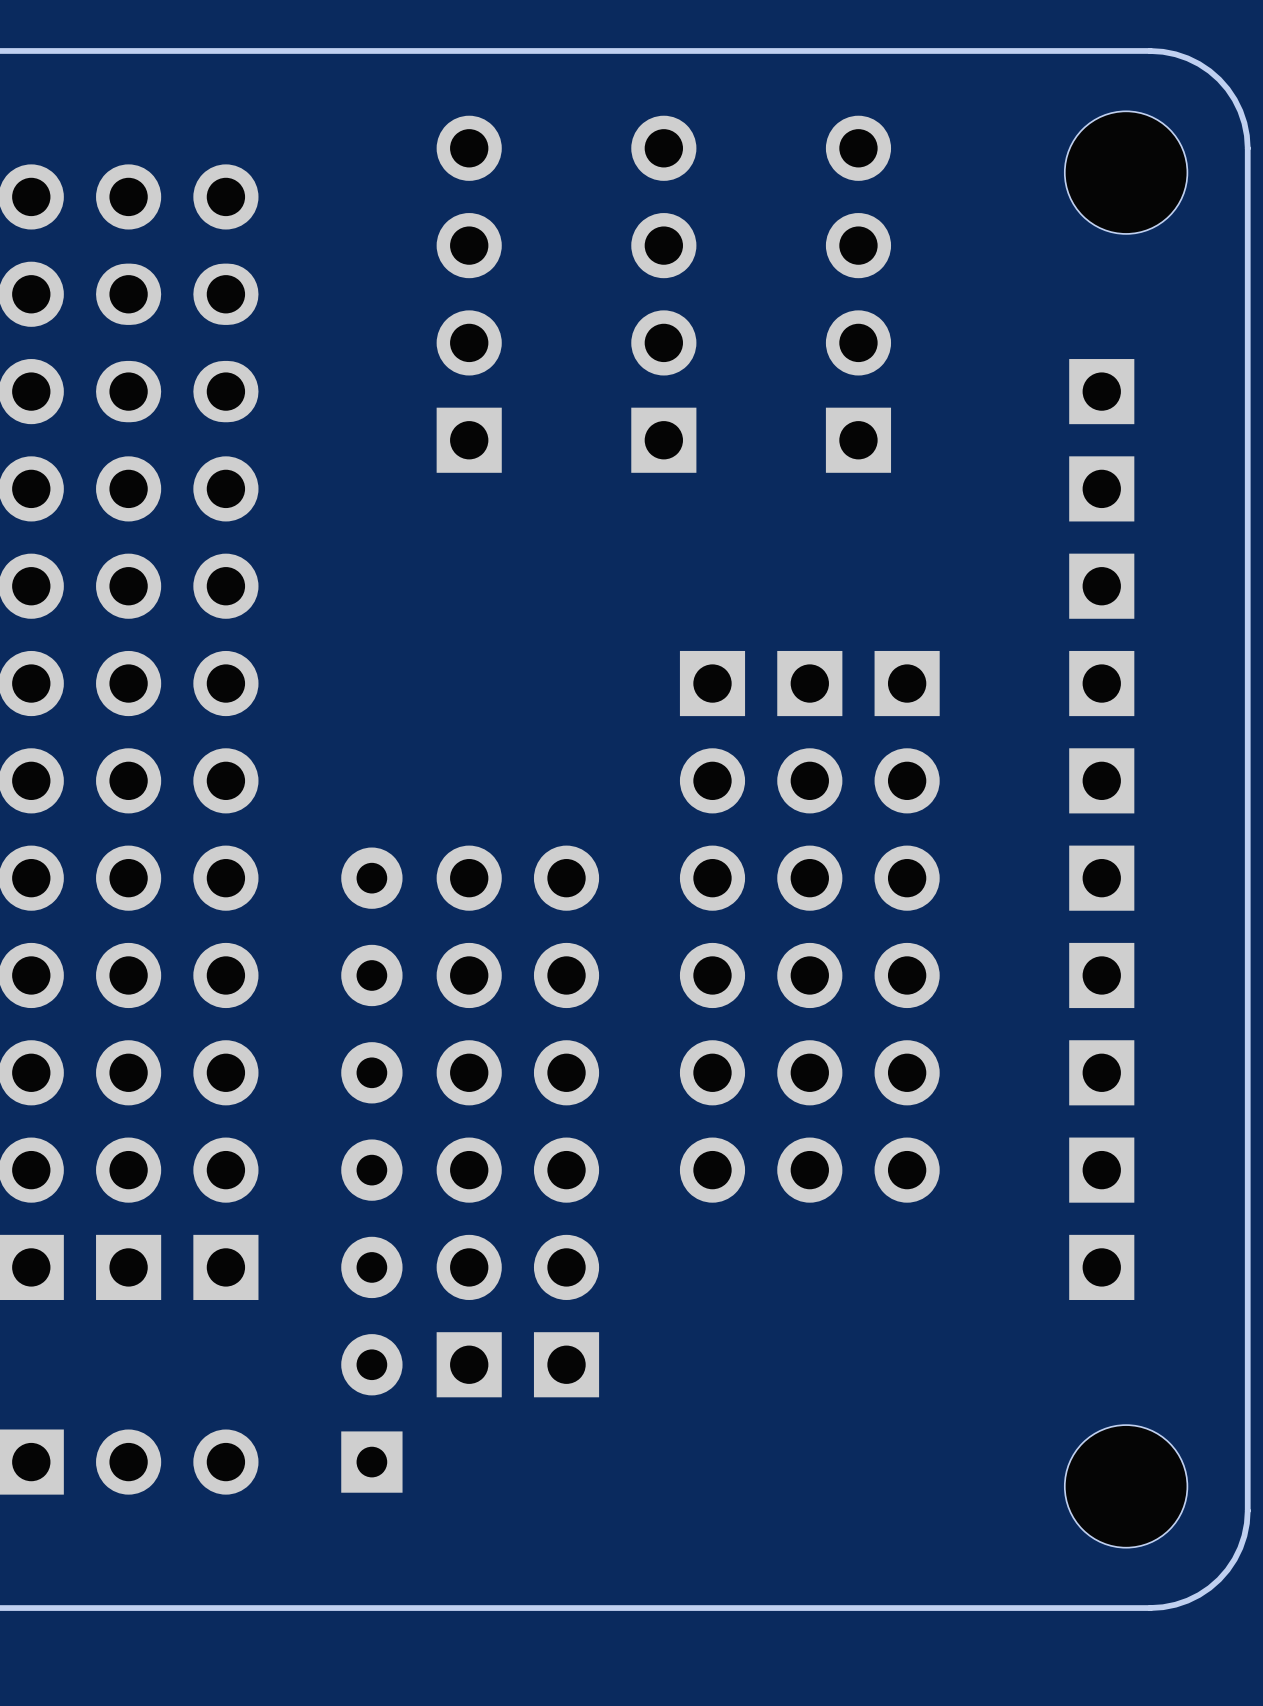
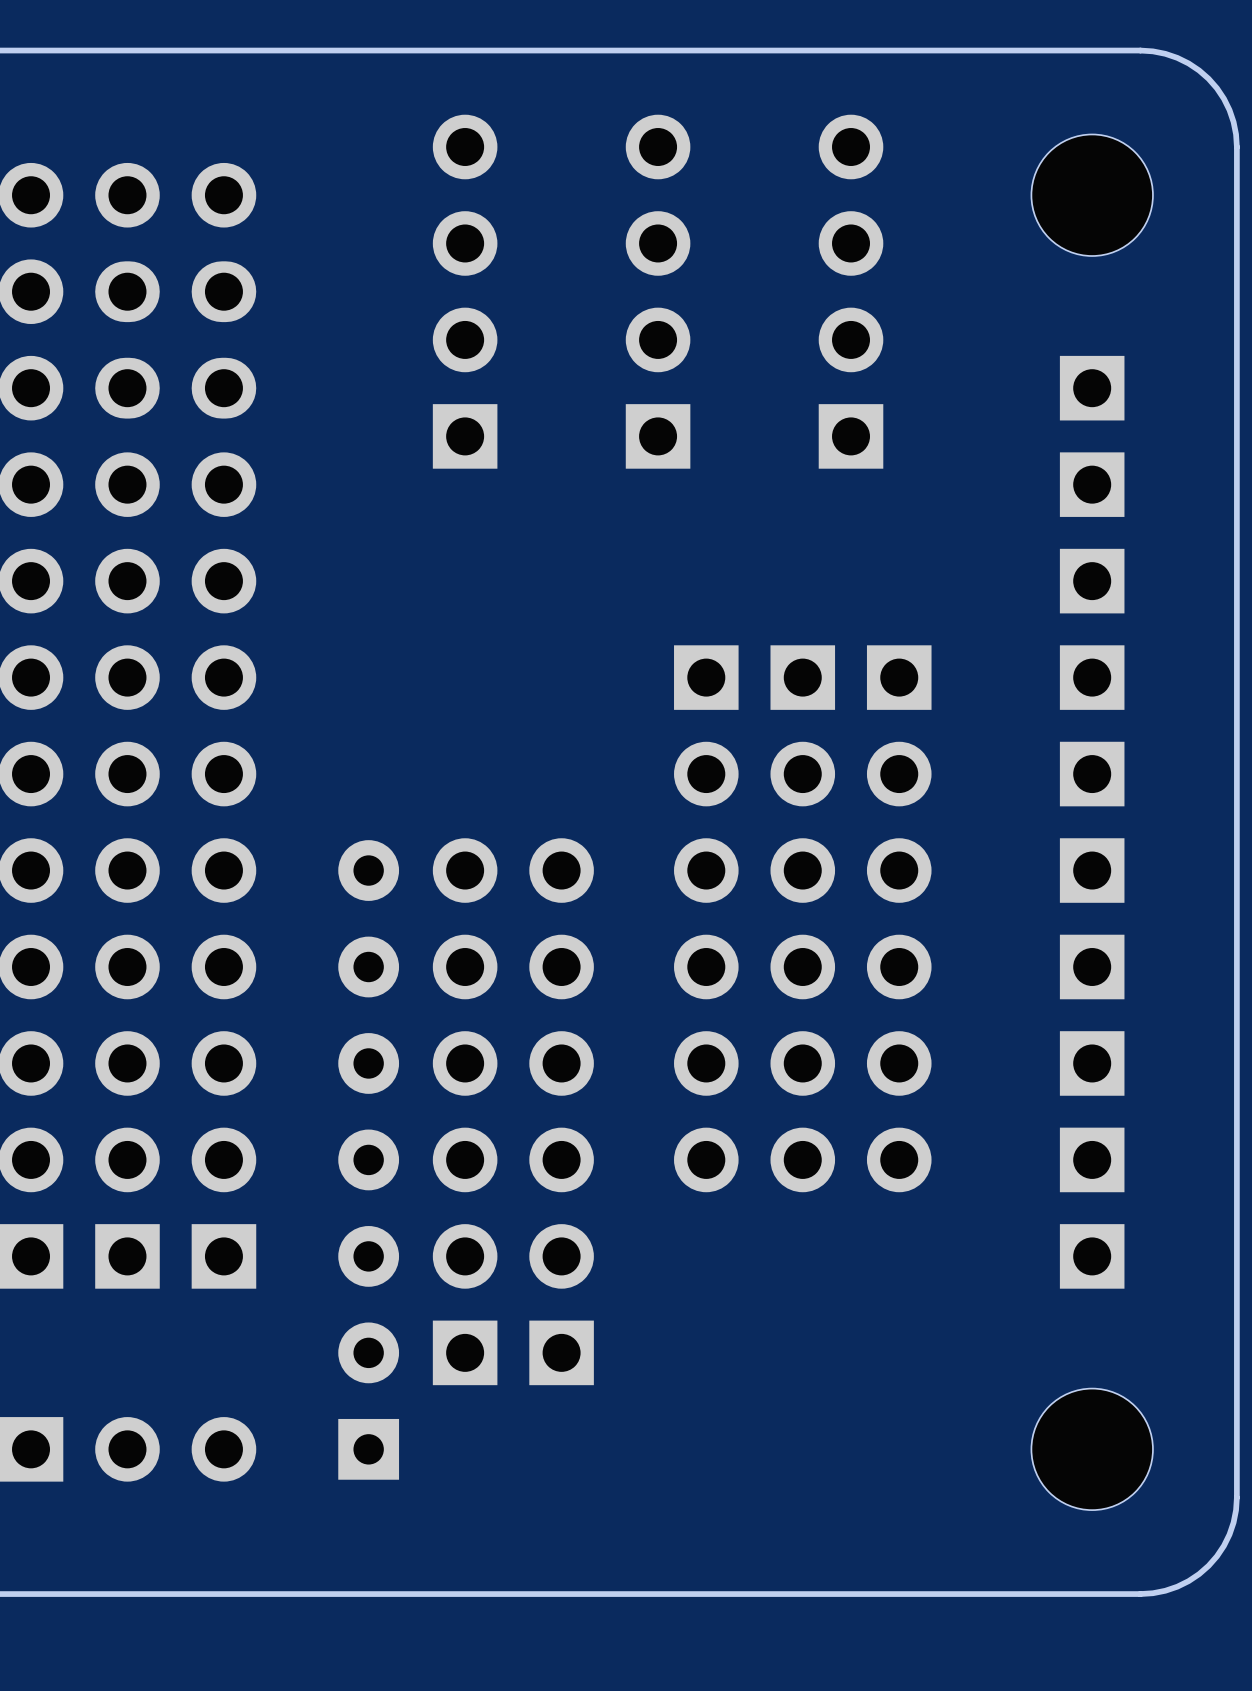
part position: (1126, 172) -> (1092, 195)
part position: (1126, 1486) -> (1092, 1449)

